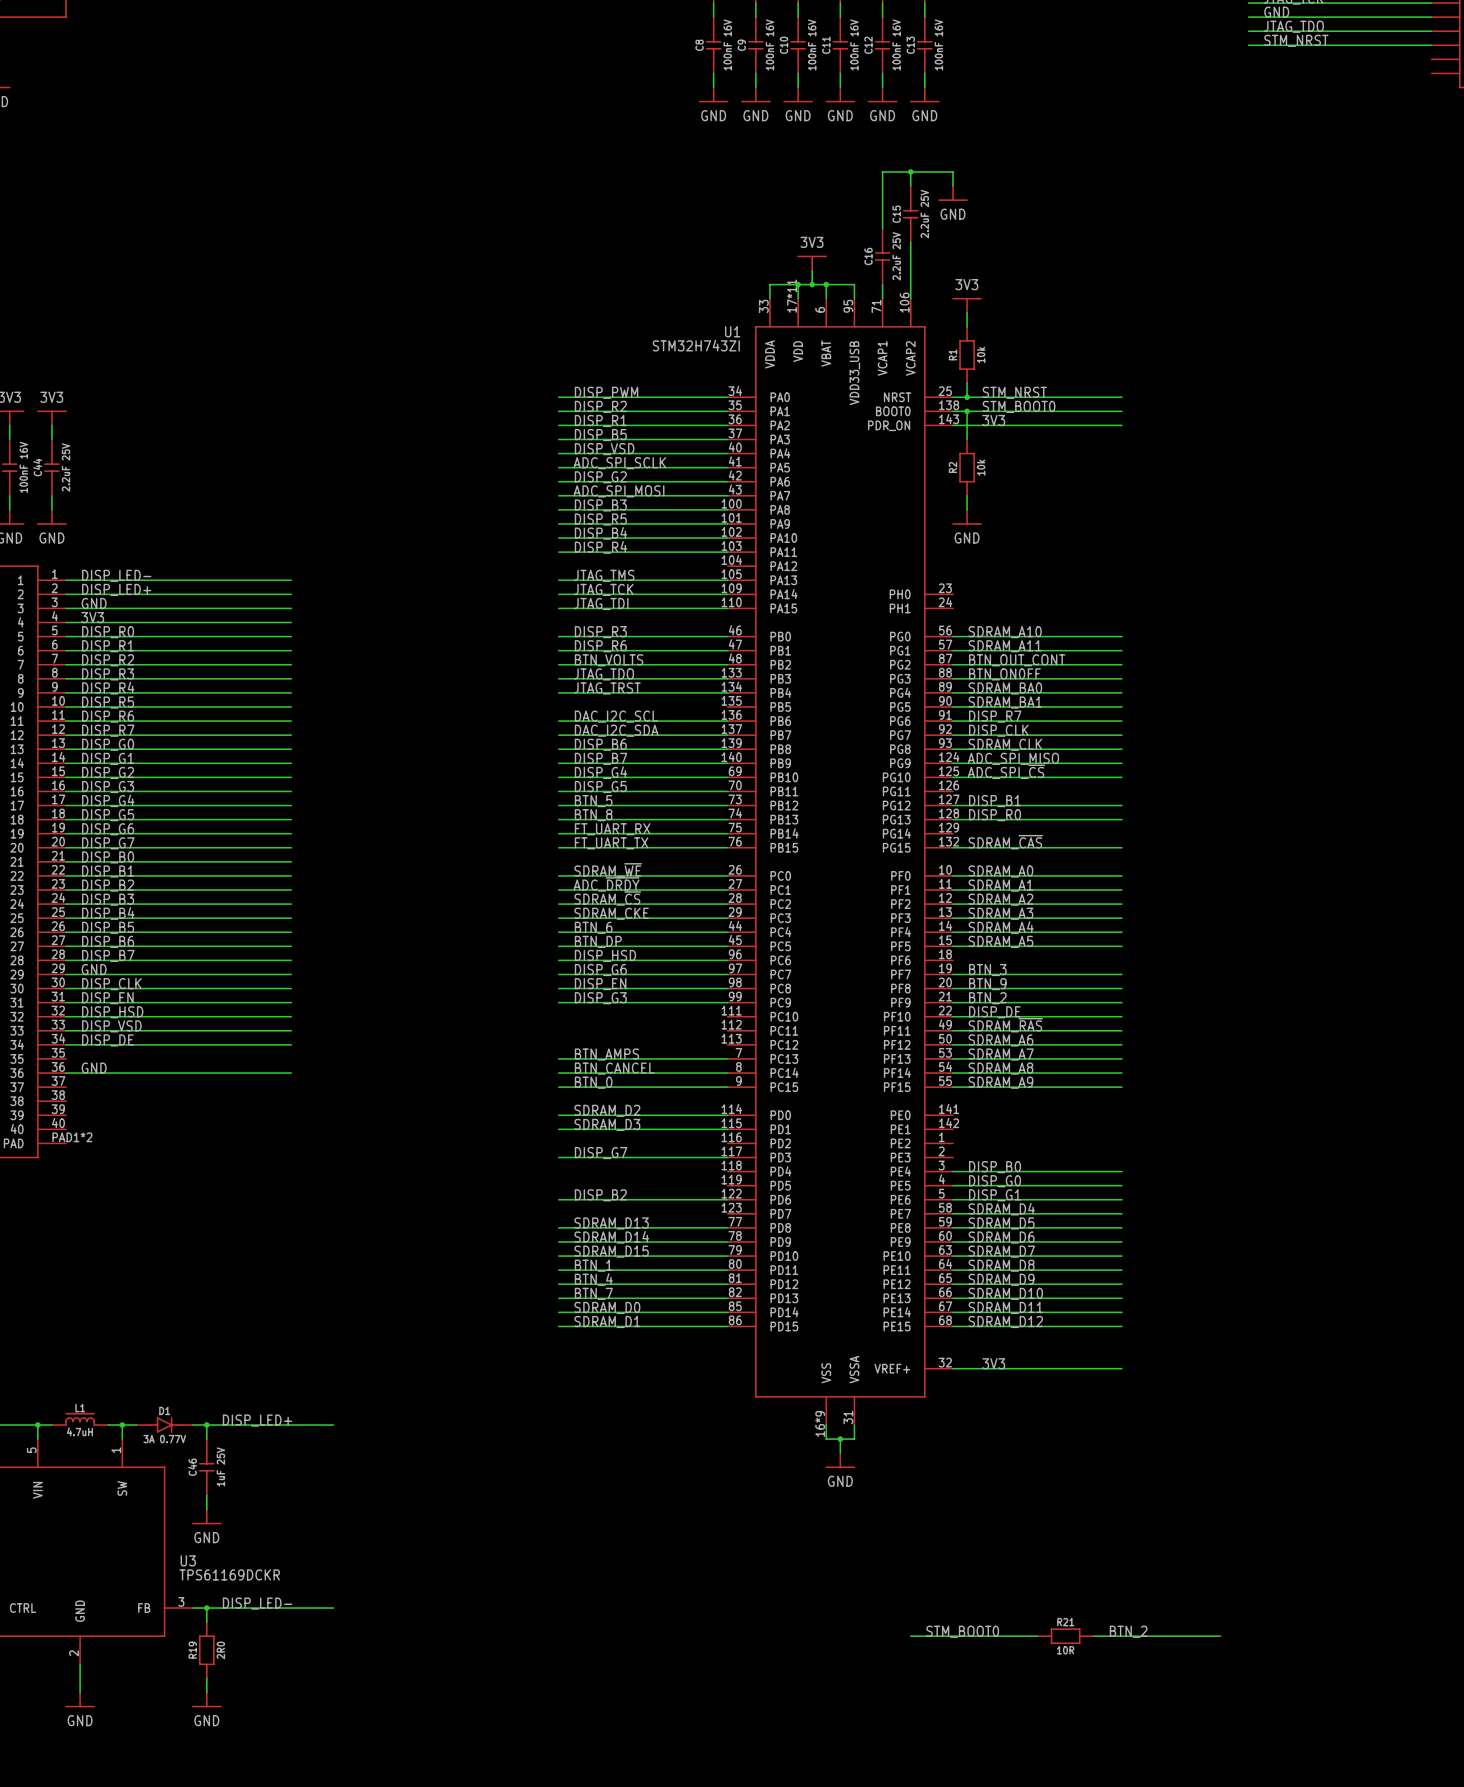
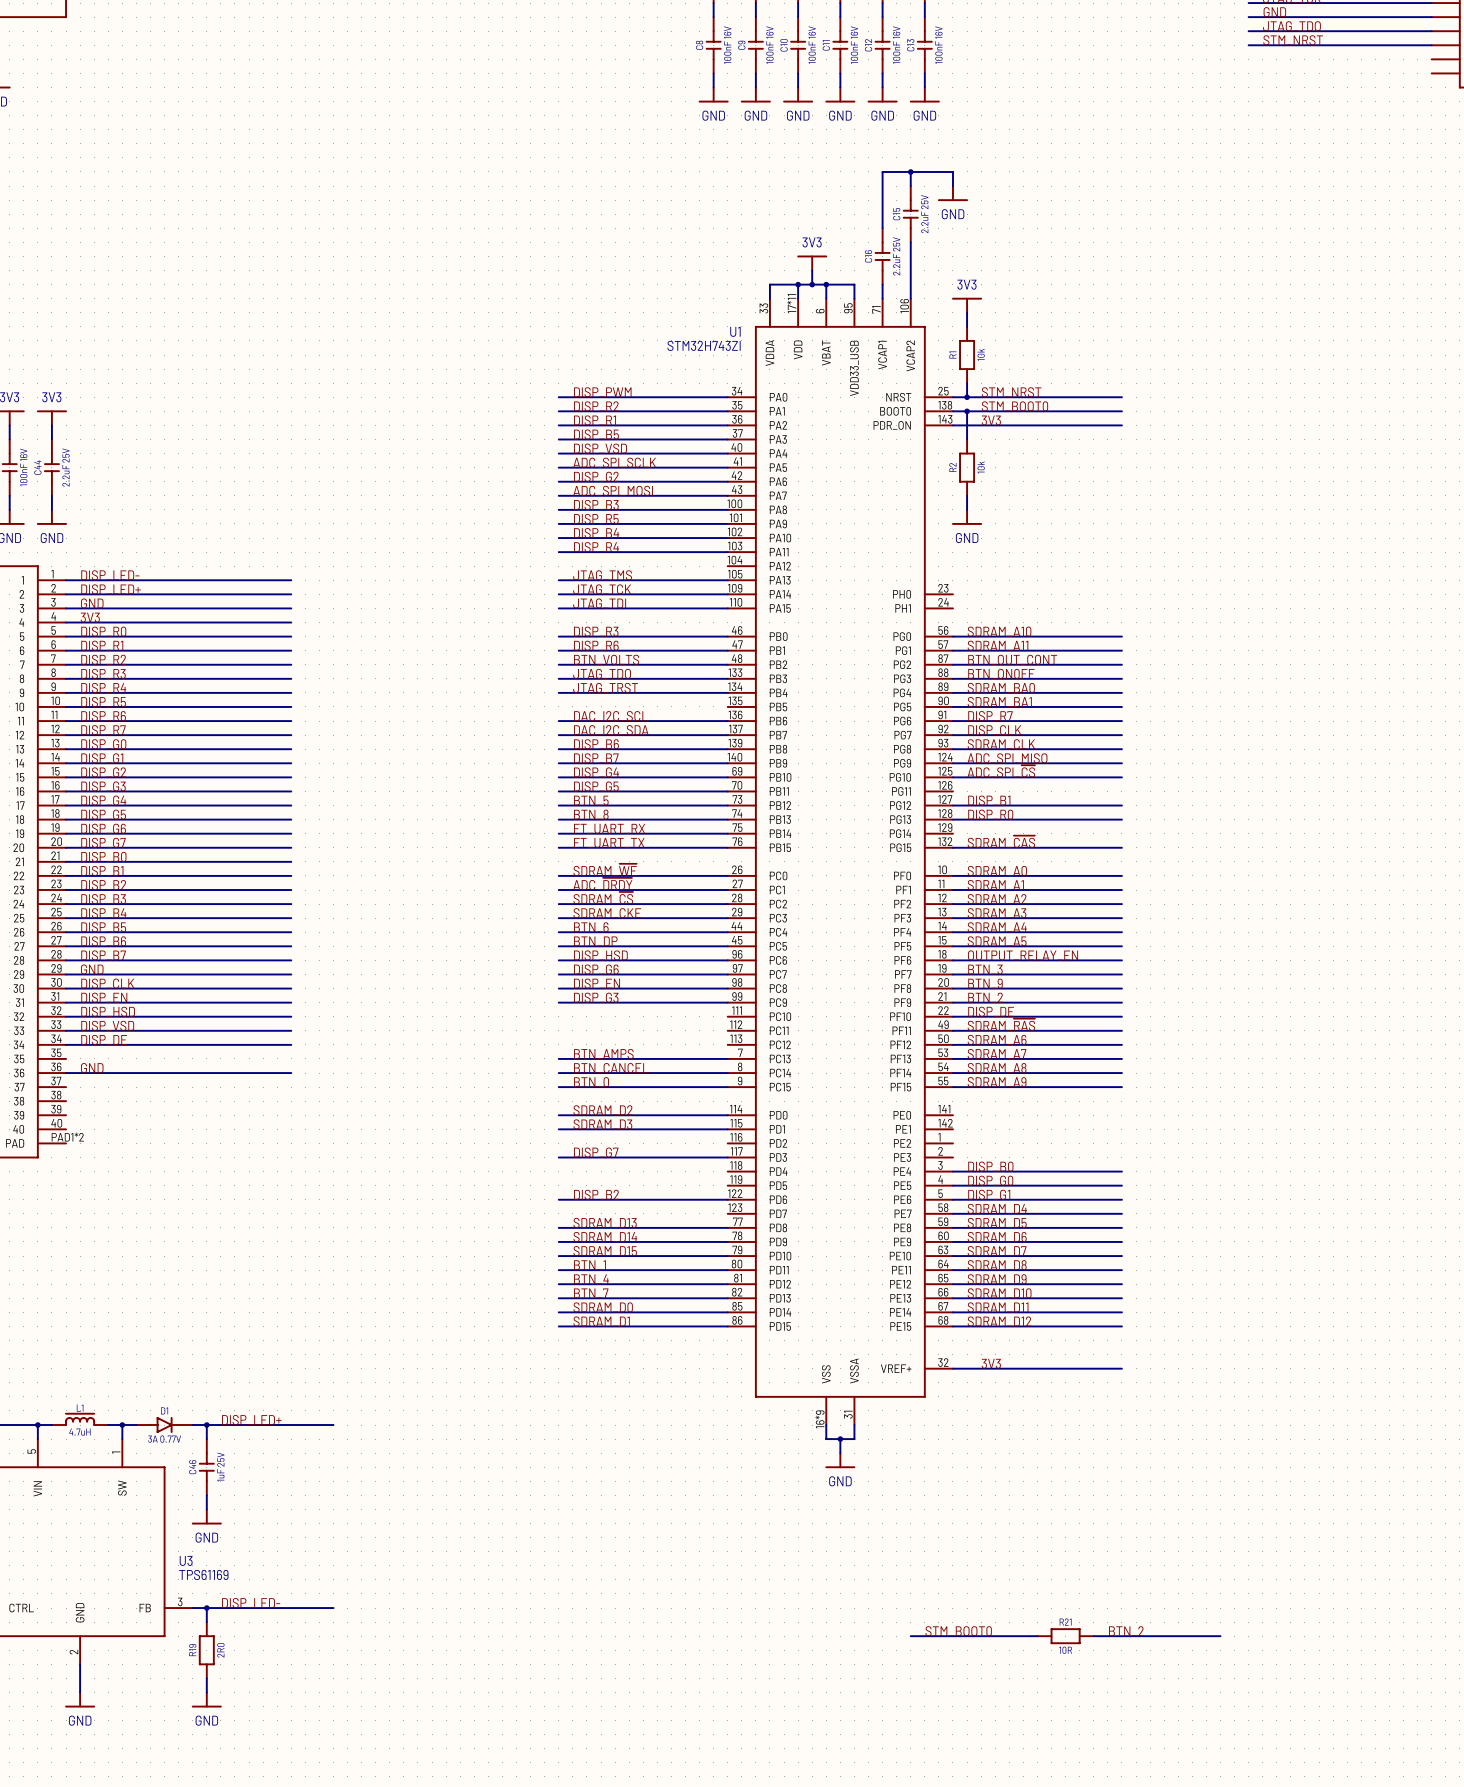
label: none -> OUTPUT_RELAY_EN (1023, 955)
wire: none -> (952, 960) (1121, 960)
U3 value: TPS61169DCKR (229, 1574) -> TPS61169 (203, 1574)

